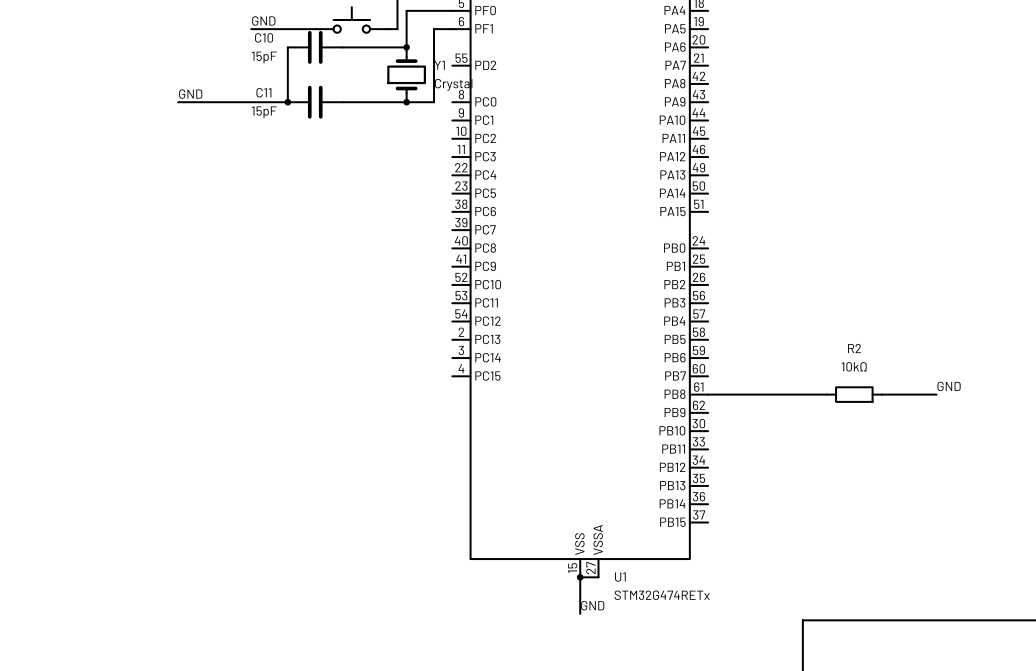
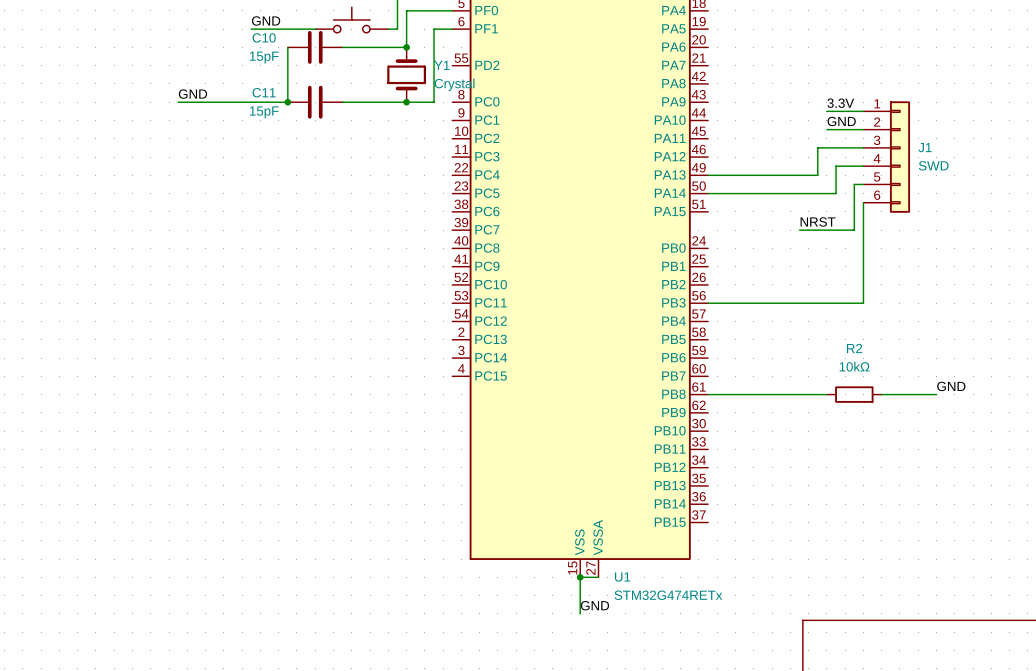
label: none -> 3.3V (840, 103)
wire: none -> (826, 111) (863, 111)
label: none -> GND (841, 121)
wire: none -> (826, 129) (863, 129)
wire: none -> (863, 147) (817, 147) (817, 175) (708, 175)
J1: none -> SWD (886, 157)
wire: none -> (863, 166) (836, 166) (836, 193) (708, 193)
wire: none -> (863, 184) (854, 184) (854, 230) (799, 230)
wire: none -> (863, 202) (863, 303) (708, 303)
label: none -> NRST (817, 221)

